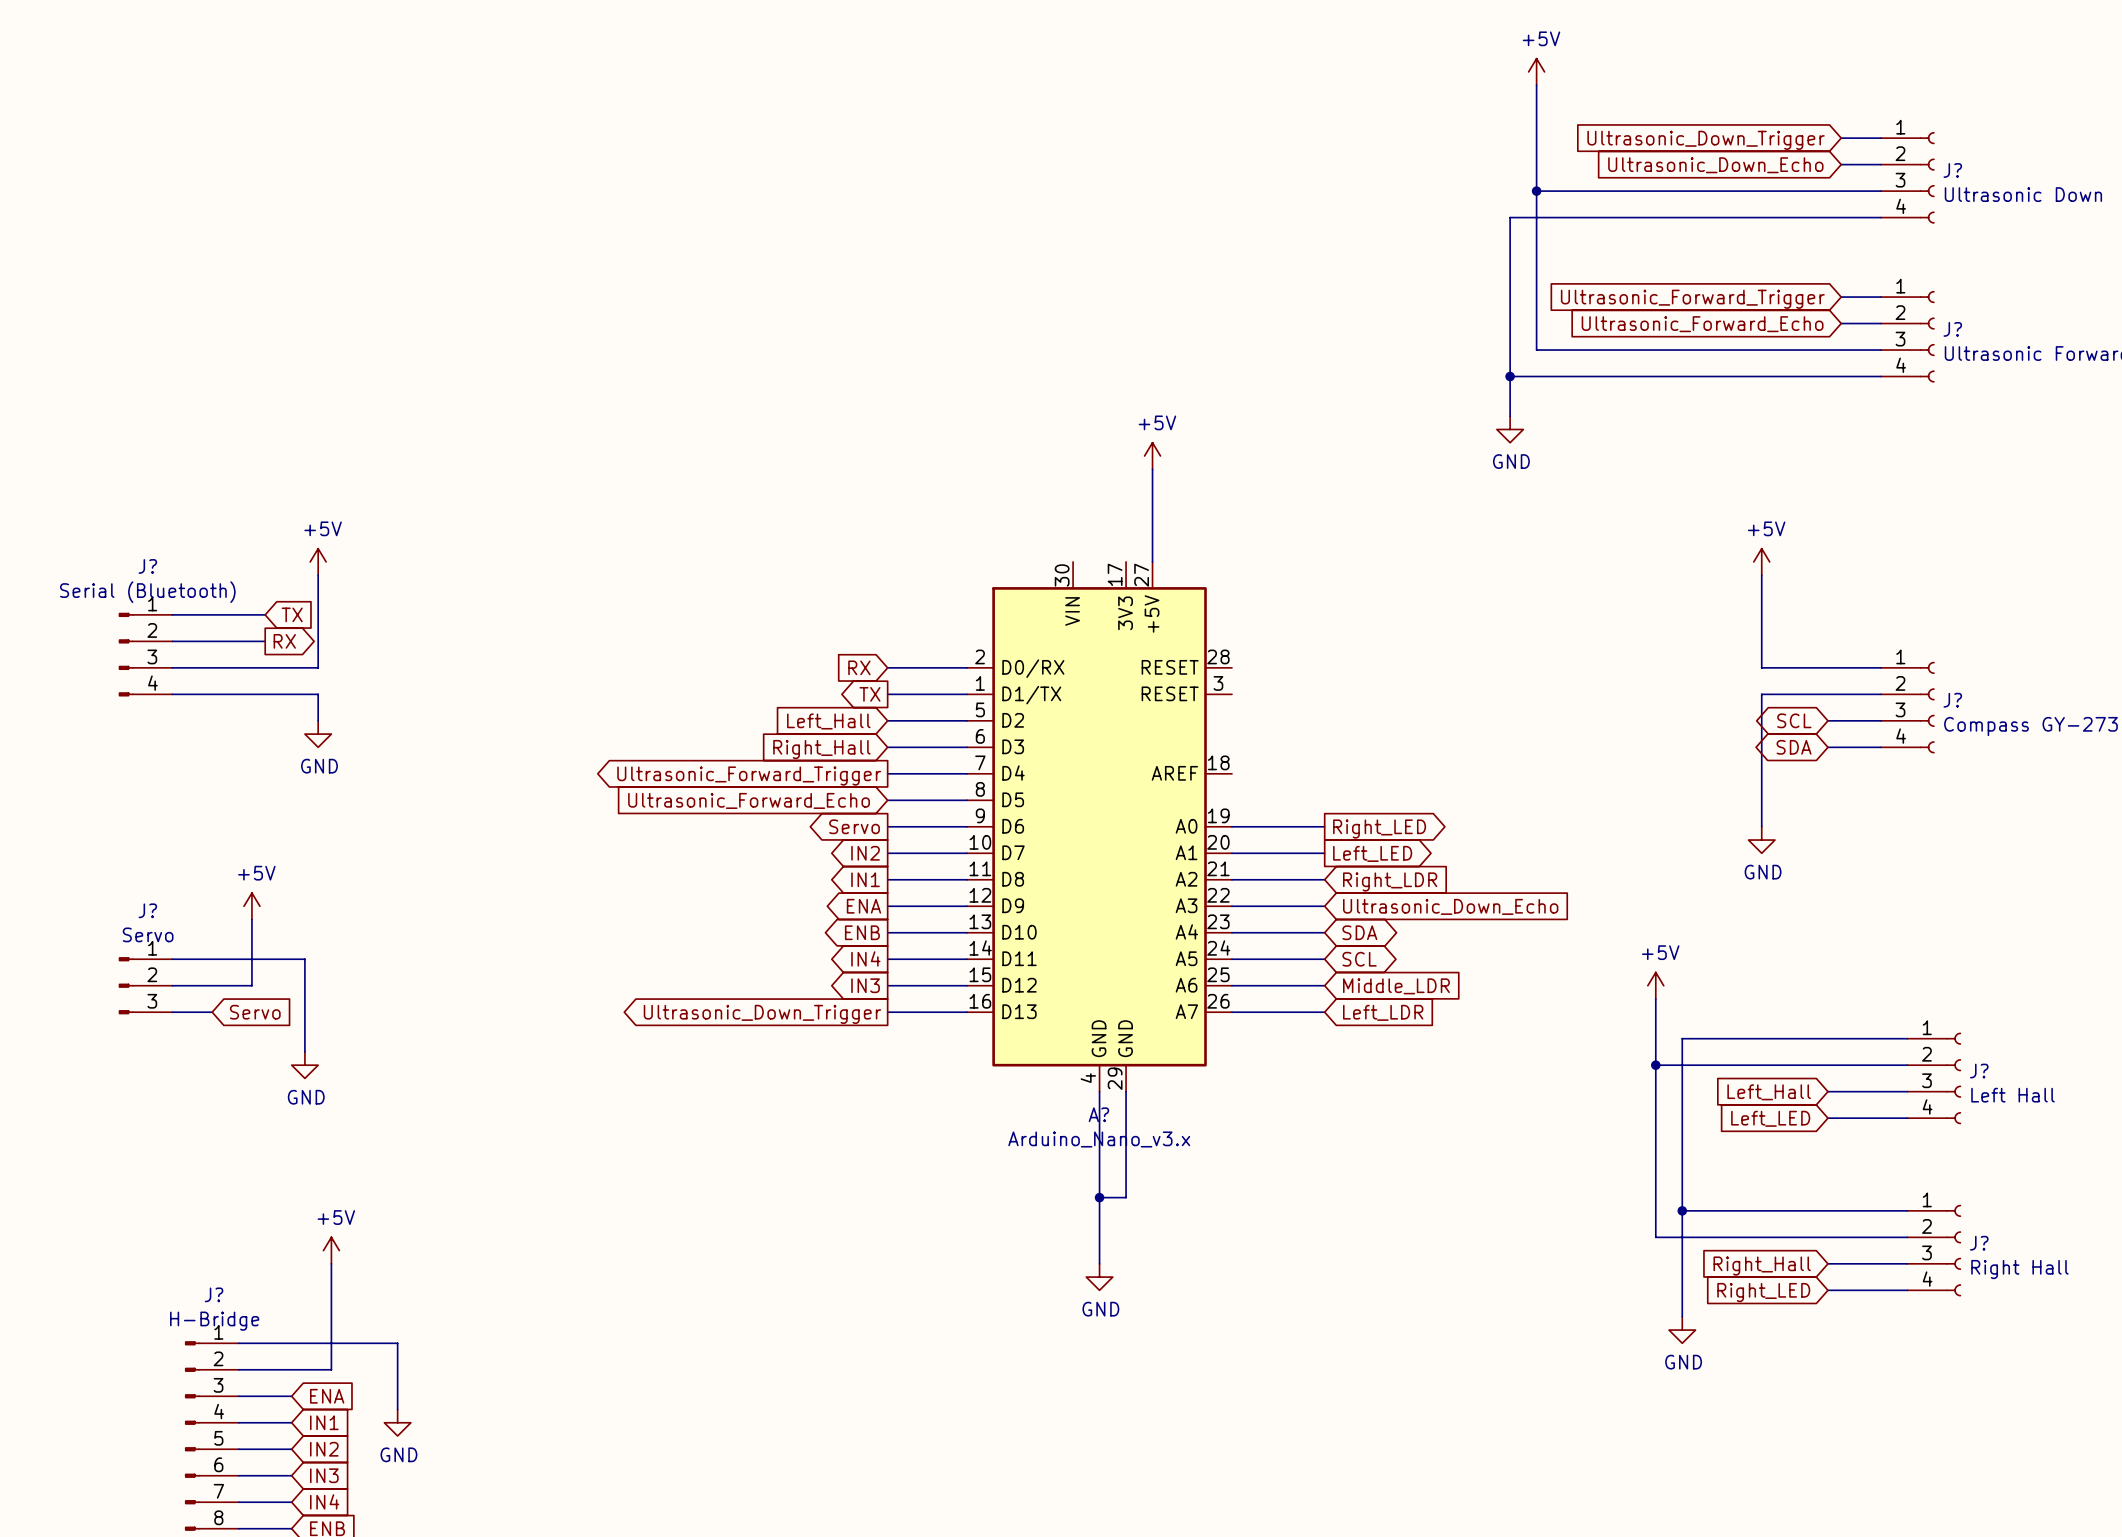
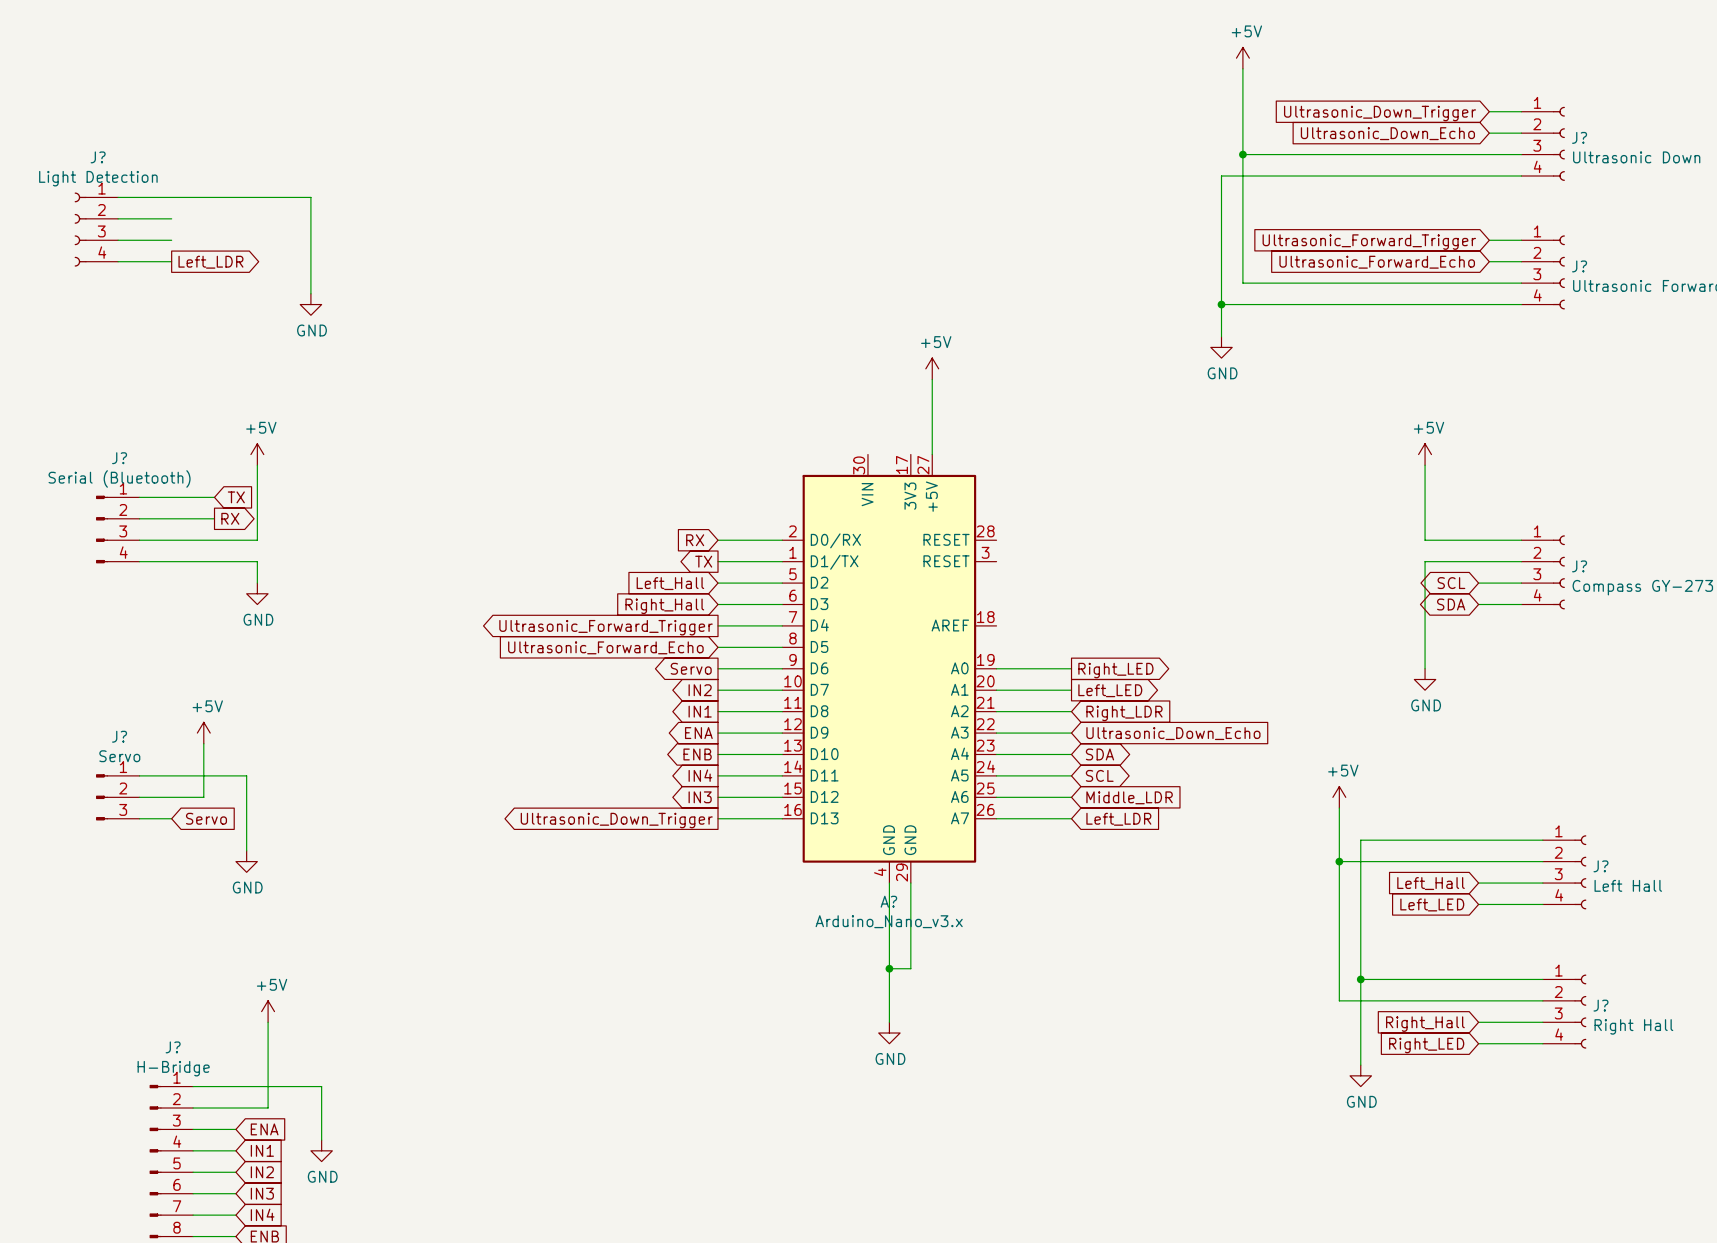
wire: none -> (118, 197) (310, 197) (310, 293)
wire: none -> (118, 218) (171, 218)
J?: none -> Light Detection (96, 229)
wire: none -> (118, 240) (171, 240)
wire: none -> (118, 261) (171, 261)
global label: none -> Left_LDR (210, 262)
power symbol: none -> GND (310, 304)

